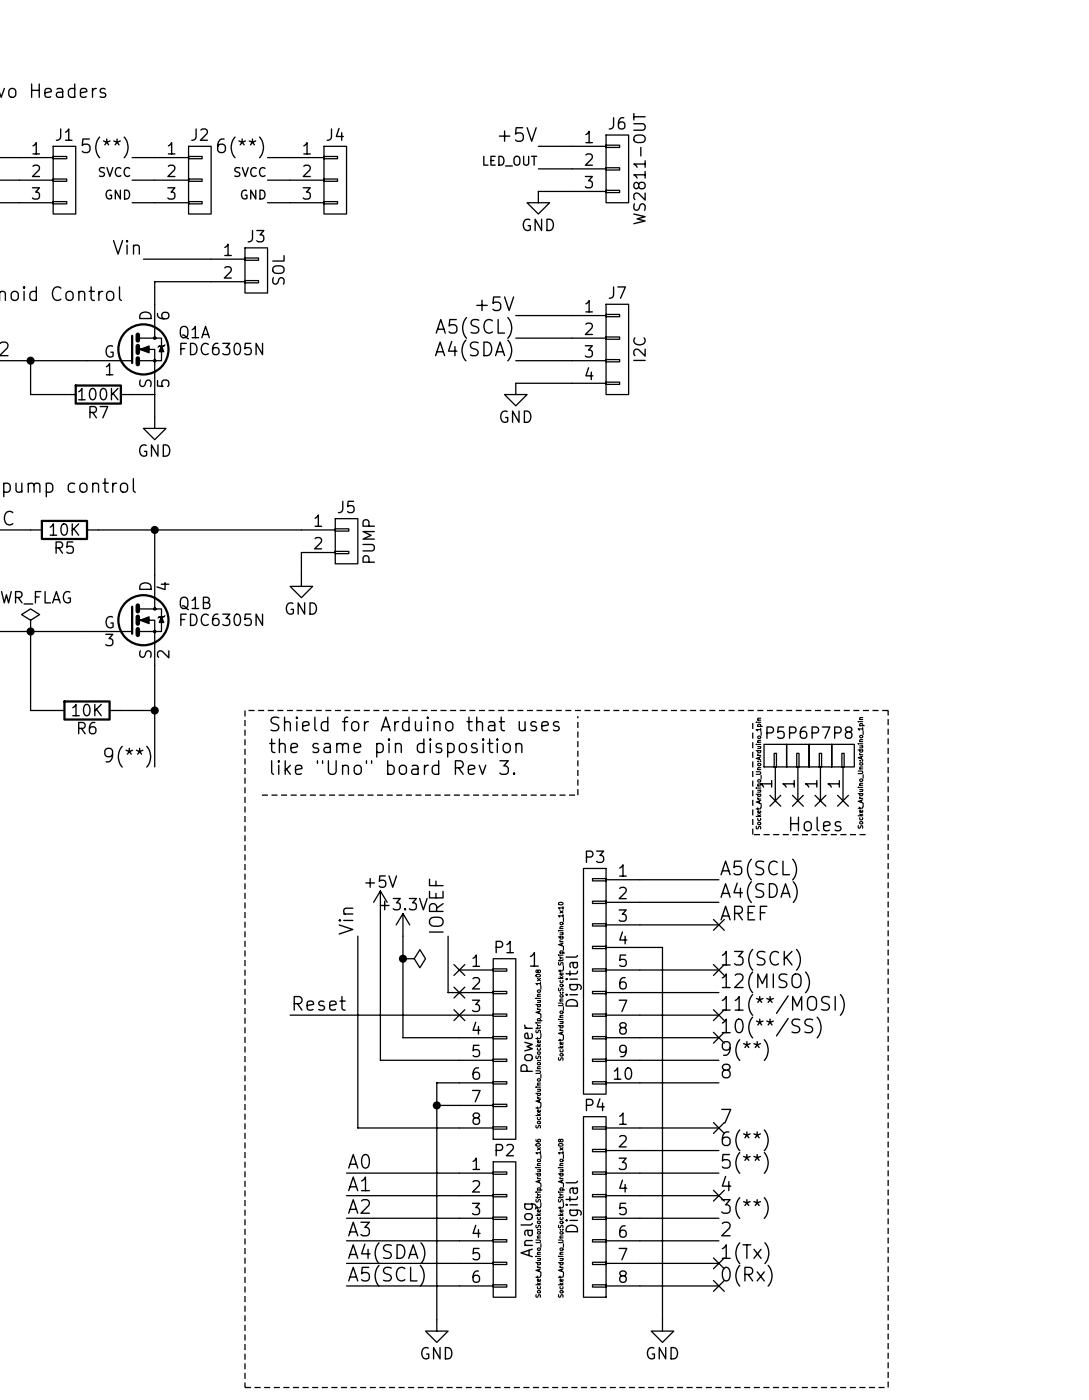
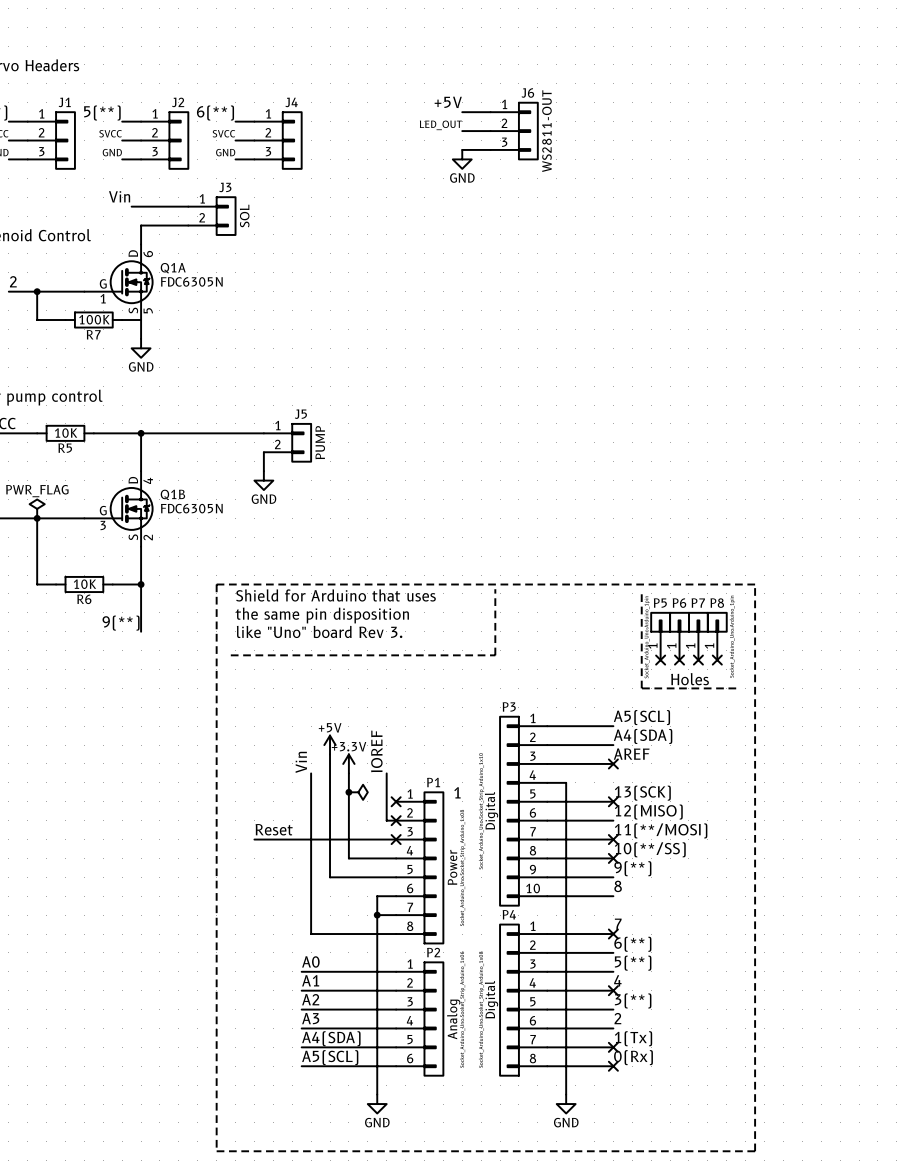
label: +5V (495, 303) -> none
wire: (515, 315) (572, 315) -> none
label: A5(SCL) (473, 327) -> none
wire: (515, 338) (572, 338) -> none
J7: I2C (600, 349) -> none
label: A4(SDA) (473, 350) -> none
wire: (515, 360) (572, 360) -> none
wire: (515, 383) (572, 383) -> none
power symbol: GND (515, 394) -> none

